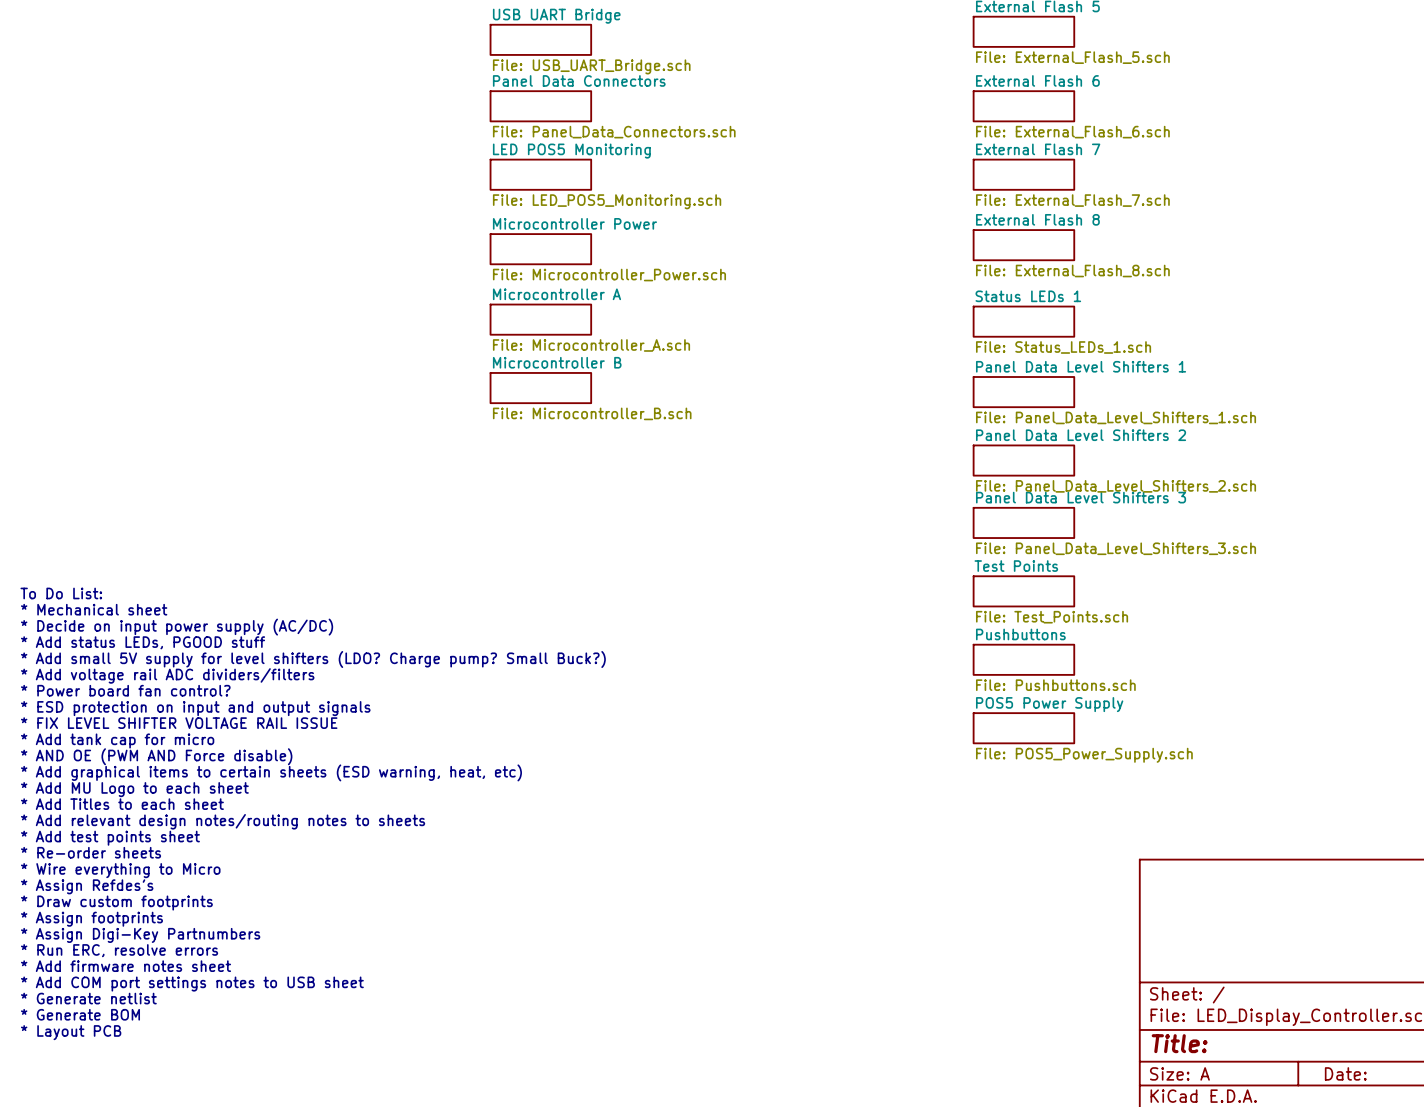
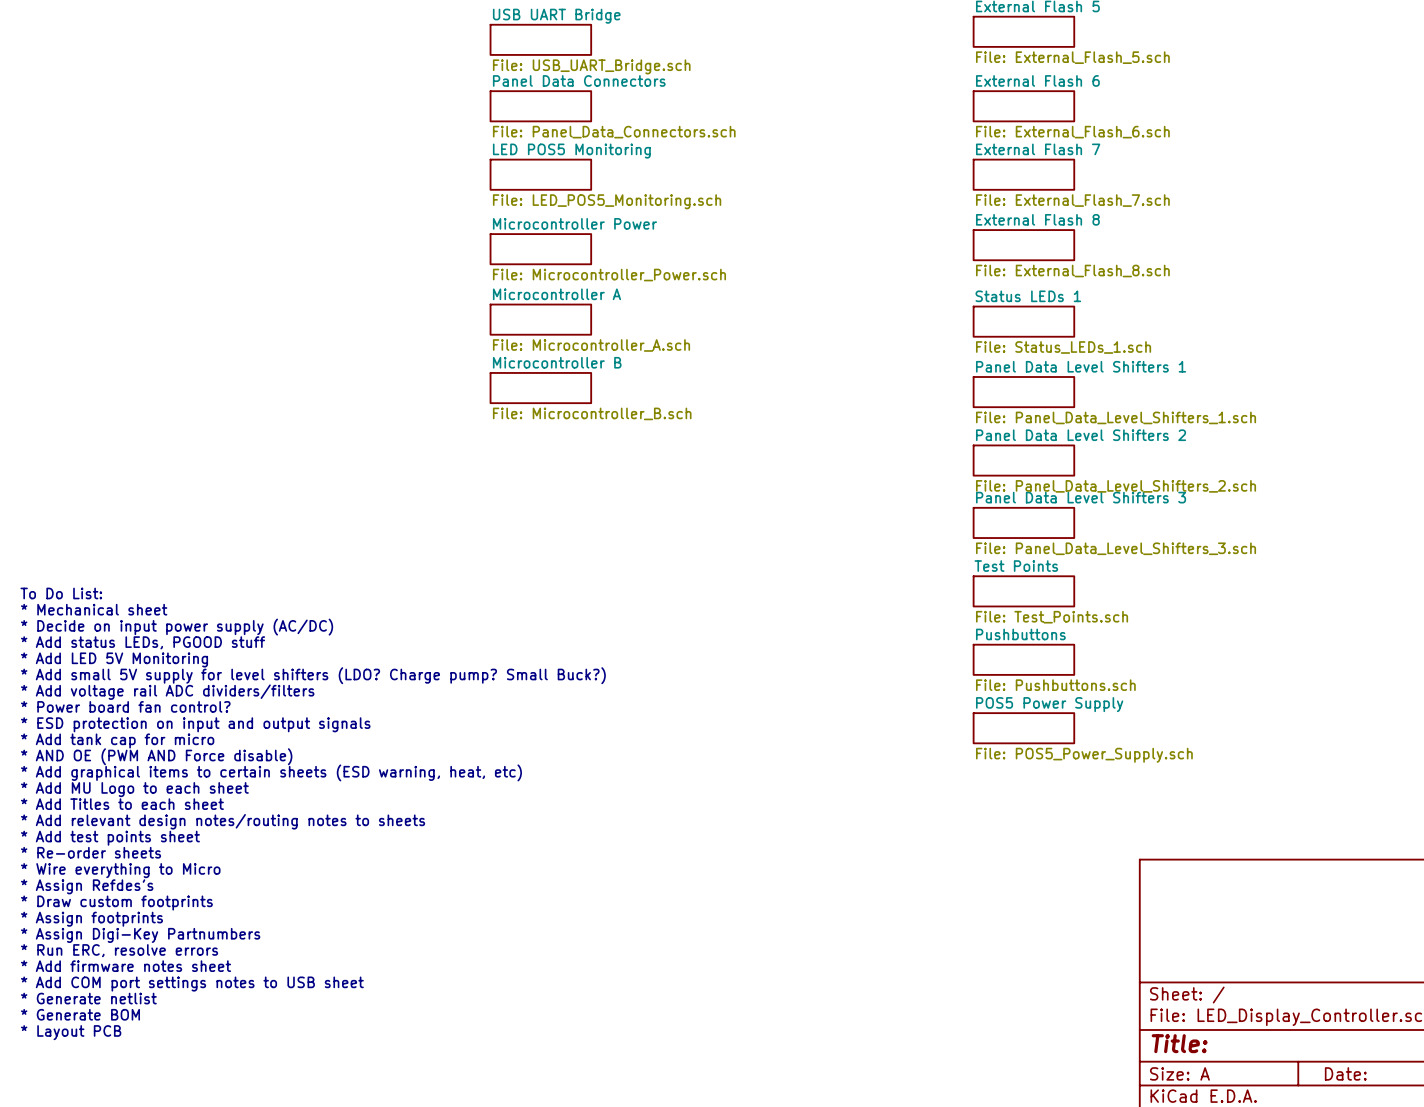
text: * Add small 5V supply for level shifters (LDO? Charge pump? Small Buck?) (313, 659) -> * Add LED 5V Monitoring (114, 659)
text: * Add voltage rail ADC dividers/filters (167, 675) -> * Add small 5V supply for level shifters (LDO? Charge pump? Small Buck?) (313, 675)
text: * Power board fan control? (125, 690) -> * Add voltage rail ADC dividers/filters (167, 692)
text: * ESD protection on input and output signals (195, 708) -> * Power board fan control? (125, 706)
text: * FIX LEVEL SHIFTER VOLTAGE RAIL ISSUE (179, 723) -> * ESD protection on input and output signals (195, 724)

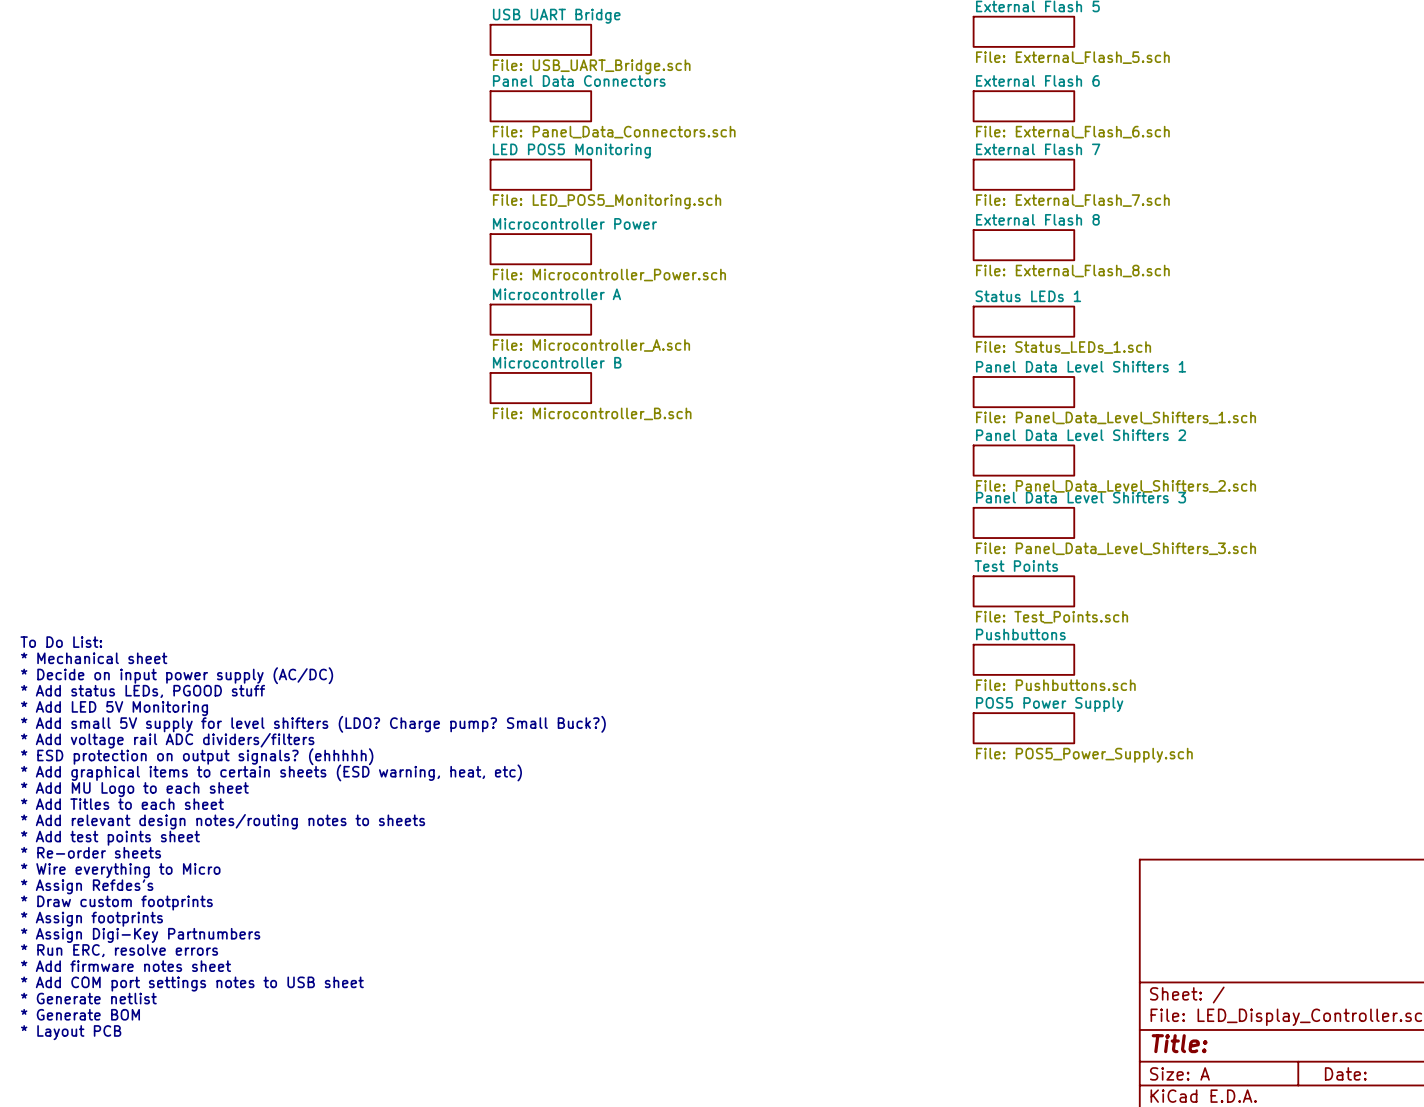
text: To Do List: (61, 593) -> none
text: * Mechanical sheet (94, 609) -> none
text: * Decide on input power supply (AC/DC) (177, 627) -> none
text: * Add status LEDs, PGOOD stuff (143, 642) -> To Do List: (61, 642)
text: * Add LED 5V Monitoring (114, 659) -> * Mechanical sheet (94, 658)
text: * Add small 5V supply for level shifters (LDO? Charge pump? Small Buck?) (313, 675) -> * Decide on input power supply (AC/DC) (177, 675)
text: * Add voltage rail ADC dividers/filters (167, 692) -> * Add status LEDs, PGOOD stuff (143, 691)
text: * Power board fan control? (125, 706) -> * Add LED 5V Monitoring (114, 708)
text: * ESD protection on input and output signals (195, 724) -> * Add small 5V supply for level shifters (LDO? Charge pump? Small Buck?) (313, 724)
text: * Add tank cap for micro (117, 740) -> * Add voltage rail ADC dividers/filters (167, 740)
text: * AND OE (PWM AND Force disable) (156, 756) -> * ESD protection on output signals? (ehhhhh) (197, 756)

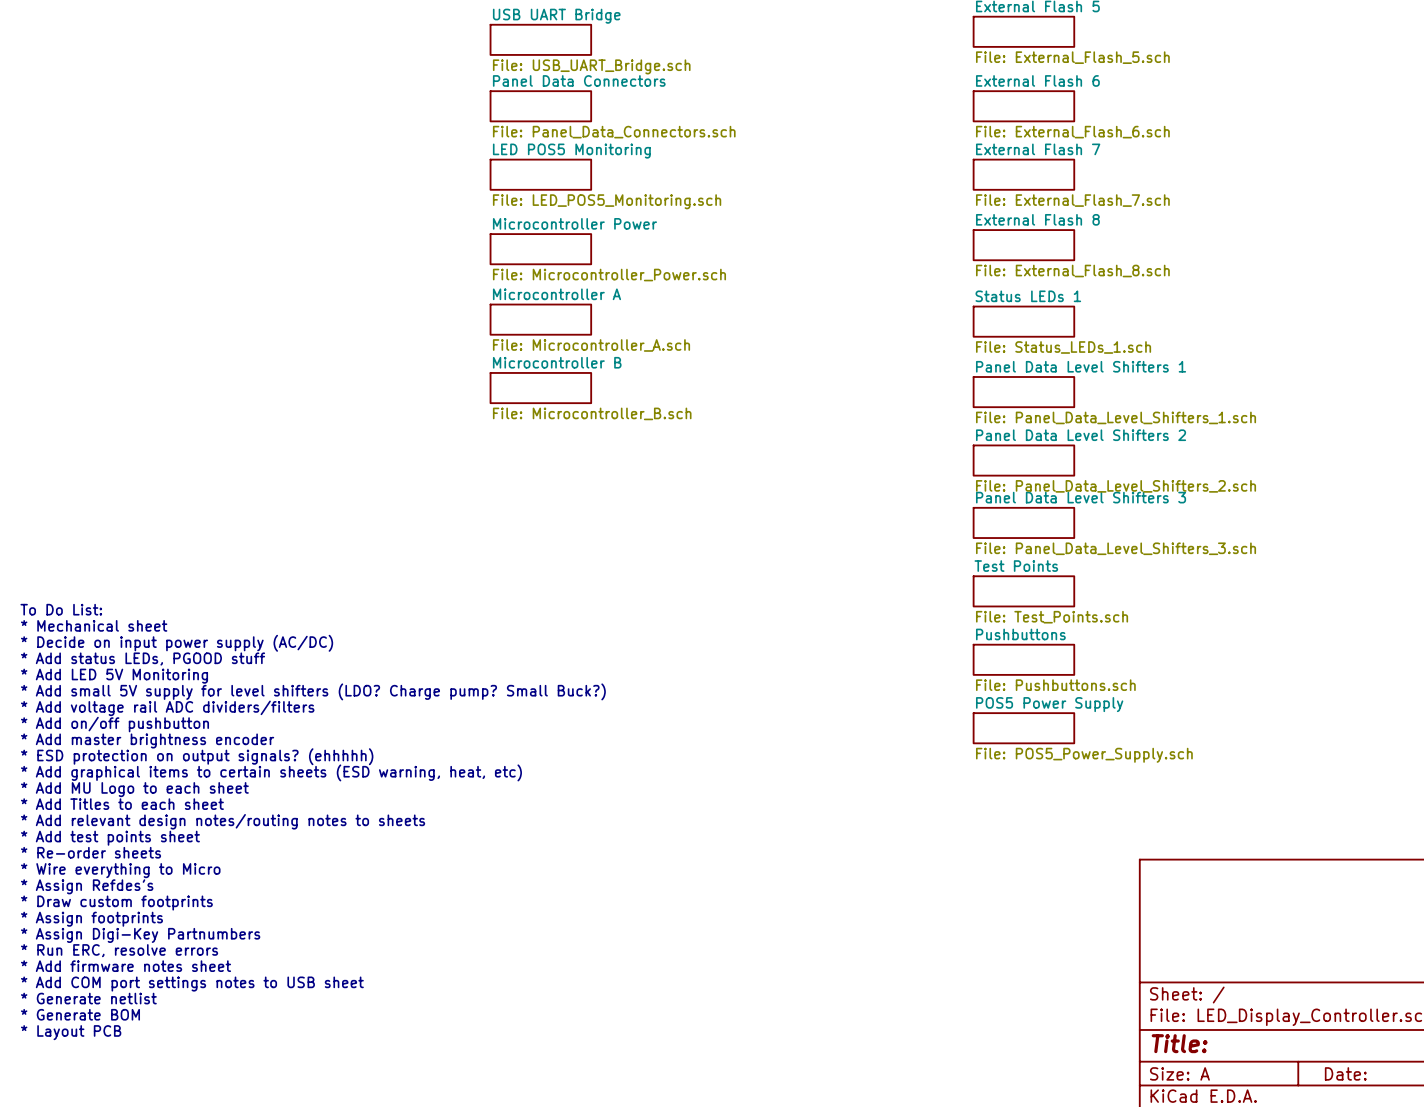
text: none -> To Do List: (61, 609)
text: none -> * Mechanical sheet (94, 625)
text: To Do List: (61, 642) -> * Decide on input power supply (AC/DC) (177, 643)
text: * Mechanical sheet (94, 658) -> * Add status LEDs, PGOOD stuff (143, 659)
text: * Decide on input power supply (AC/DC) (177, 675) -> * Add LED 5V Monitoring (114, 676)
text: * Add status LEDs, PGOOD stuff (143, 691) -> * Add small 5V supply for level shifters (LDO? Charge pump? Small Buck?) (313, 691)
text: * Add LED 5V Monitoring (114, 708) -> * Add voltage rail ADC dividers/filters (167, 708)
text: * Add small 5V supply for level shifters (LDO? Charge pump? Small Buck?) (313, 724) -> * Add on/off pushbutton (114, 724)
text: * Add voltage rail ADC dividers/filters (167, 740) -> * Add master brightness encoder (147, 740)

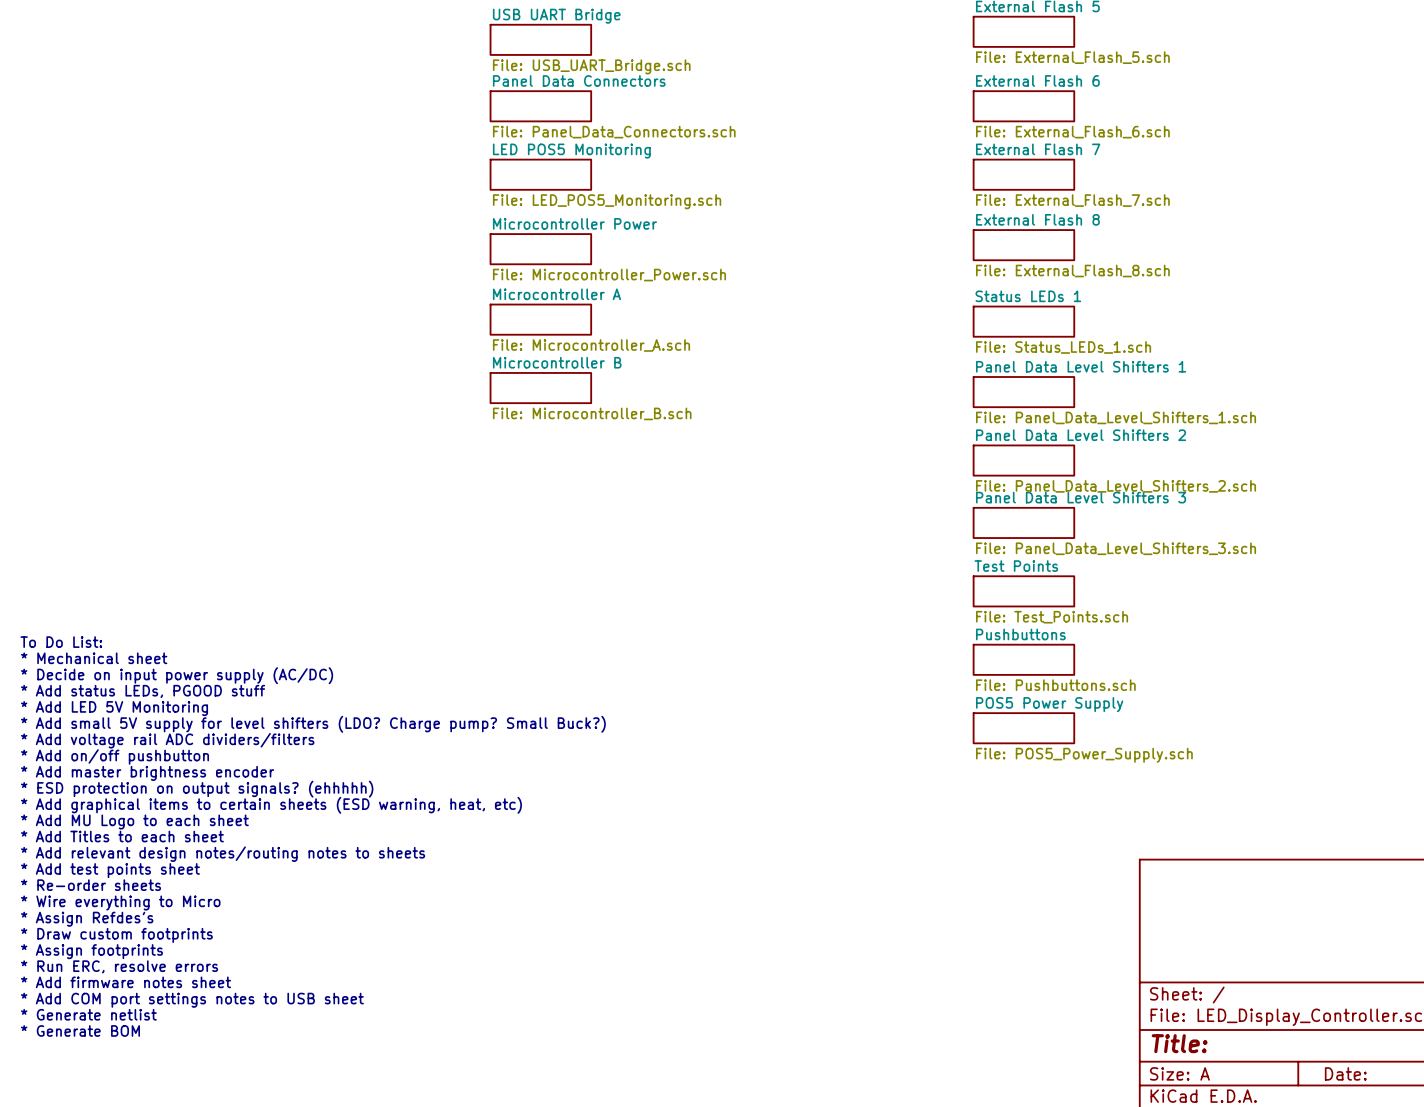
text: To Do List: (61, 609) -> none
text: * Mechanical sheet (94, 625) -> none
text: * Decide on input power supply (AC/DC) (177, 643) -> To Do List: (61, 642)
text: * Add status LEDs, PGOOD stuff (143, 659) -> * Mechanical sheet (94, 658)
text: * Add LED 5V Monitoring (114, 676) -> * Decide on input power supply (AC/DC) (177, 675)
text: * Add small 5V supply for level shifters (LDO? Charge pump? Small Buck?) (313, 691) -> * Add status LEDs, PGOOD stuff (143, 691)
text: * Add voltage rail ADC dividers/filters (167, 708) -> * Add LED 5V Monitoring (114, 708)
text: * Add on/off pushbutton (114, 724) -> * Add small 5V supply for level shifters (LDO? Charge pump? Small Buck?) (313, 724)
text: * Add master brightness encoder (147, 740) -> * Add voltage rail ADC dividers/filters (167, 740)
text: * ESD protection on output signals? (ehhhhh) (197, 756) -> * Add on/off pushbutton (114, 756)
text: * Add graphical items to certain sheets (ESD warning, heat, etc) (271, 772) -> * Add master brightness encoder (147, 773)
text: * Add MU Logo to each sheet (134, 789) -> * ESD protection on output signals? (ehhhhh) (197, 789)
text: * Add Titles to each sheet (122, 804) -> * Add graphical items to certain sheets (ESD warning, heat, etc) (271, 805)
text: * Add relevant design notes/routing notes to sheets (223, 821) -> * Add MU Logo to each sheet (134, 822)
text: * Add test points sheet (110, 838) -> * Add Titles to each sheet (122, 836)
text: * Re-order sheets (91, 852) -> * Add relevant design notes/routing notes to sheets (223, 854)
text: * Wire everything to Micro (120, 870) -> * Add test points sheet (110, 870)
text: * Assign Refdes's (87, 886) -> * Re-order sheets (91, 885)
text: * Draw custom footprints (116, 903) -> * Wire everything to Micro (120, 903)
text: * Assign footprints (91, 919) -> * Assign Refdes's (87, 919)
text: * Assign Digi-Key Partnumbers (140, 935) -> * Draw custom footprints (116, 935)
text: * Run ERC, resolve errors (119, 950) -> * Assign footprints (91, 951)
text: * Add firmware notes sheet (126, 966) -> * Run ERC, resolve errors (119, 966)
text: * Add COM port settings notes to USB sheet (192, 984) -> * Add firmware notes sheet (126, 982)
text: * Generate netlist (88, 998) -> * Add COM port settings notes to USB sheet (192, 1000)
text: * Generate BOM (80, 1014) -> * Generate netlist (88, 1014)
text: * Layout PCB (71, 1032) -> * Generate BOM (80, 1030)

